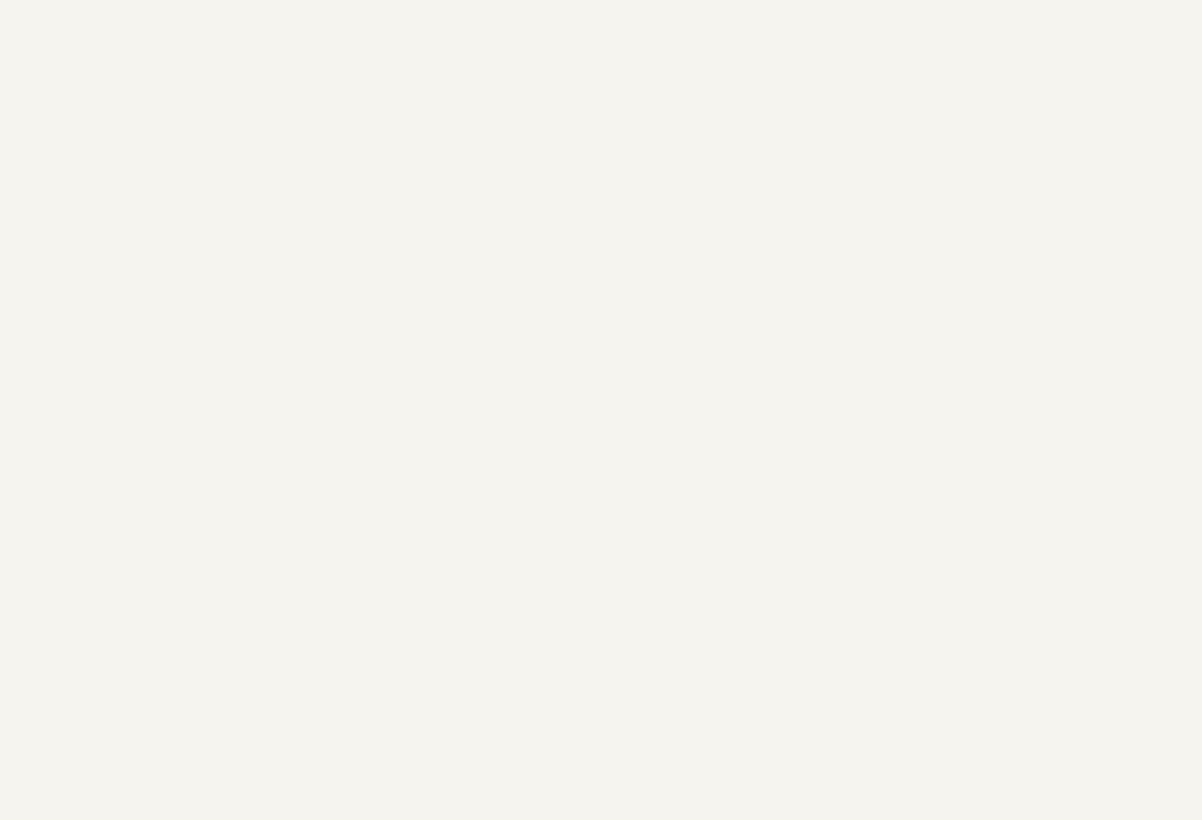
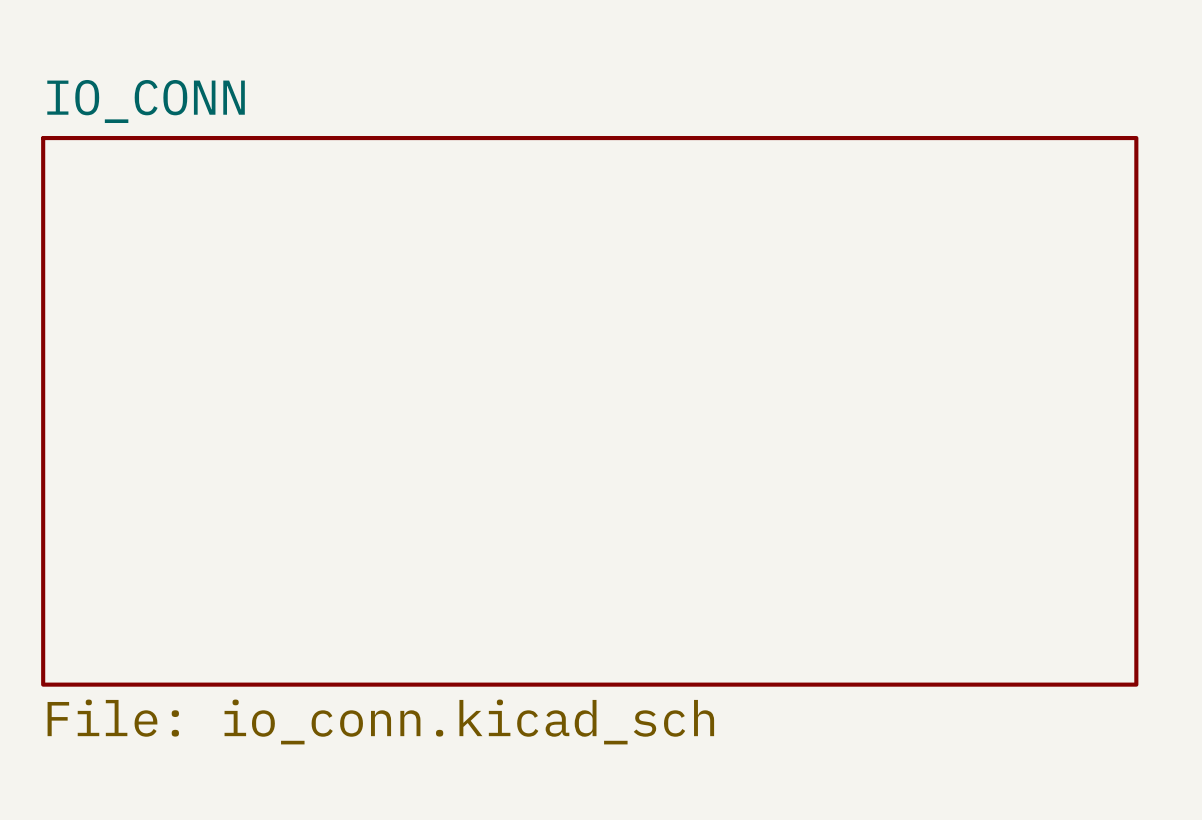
sheet IO_CONN: none -> File: io_conn.kicad_sch (589, 411)

